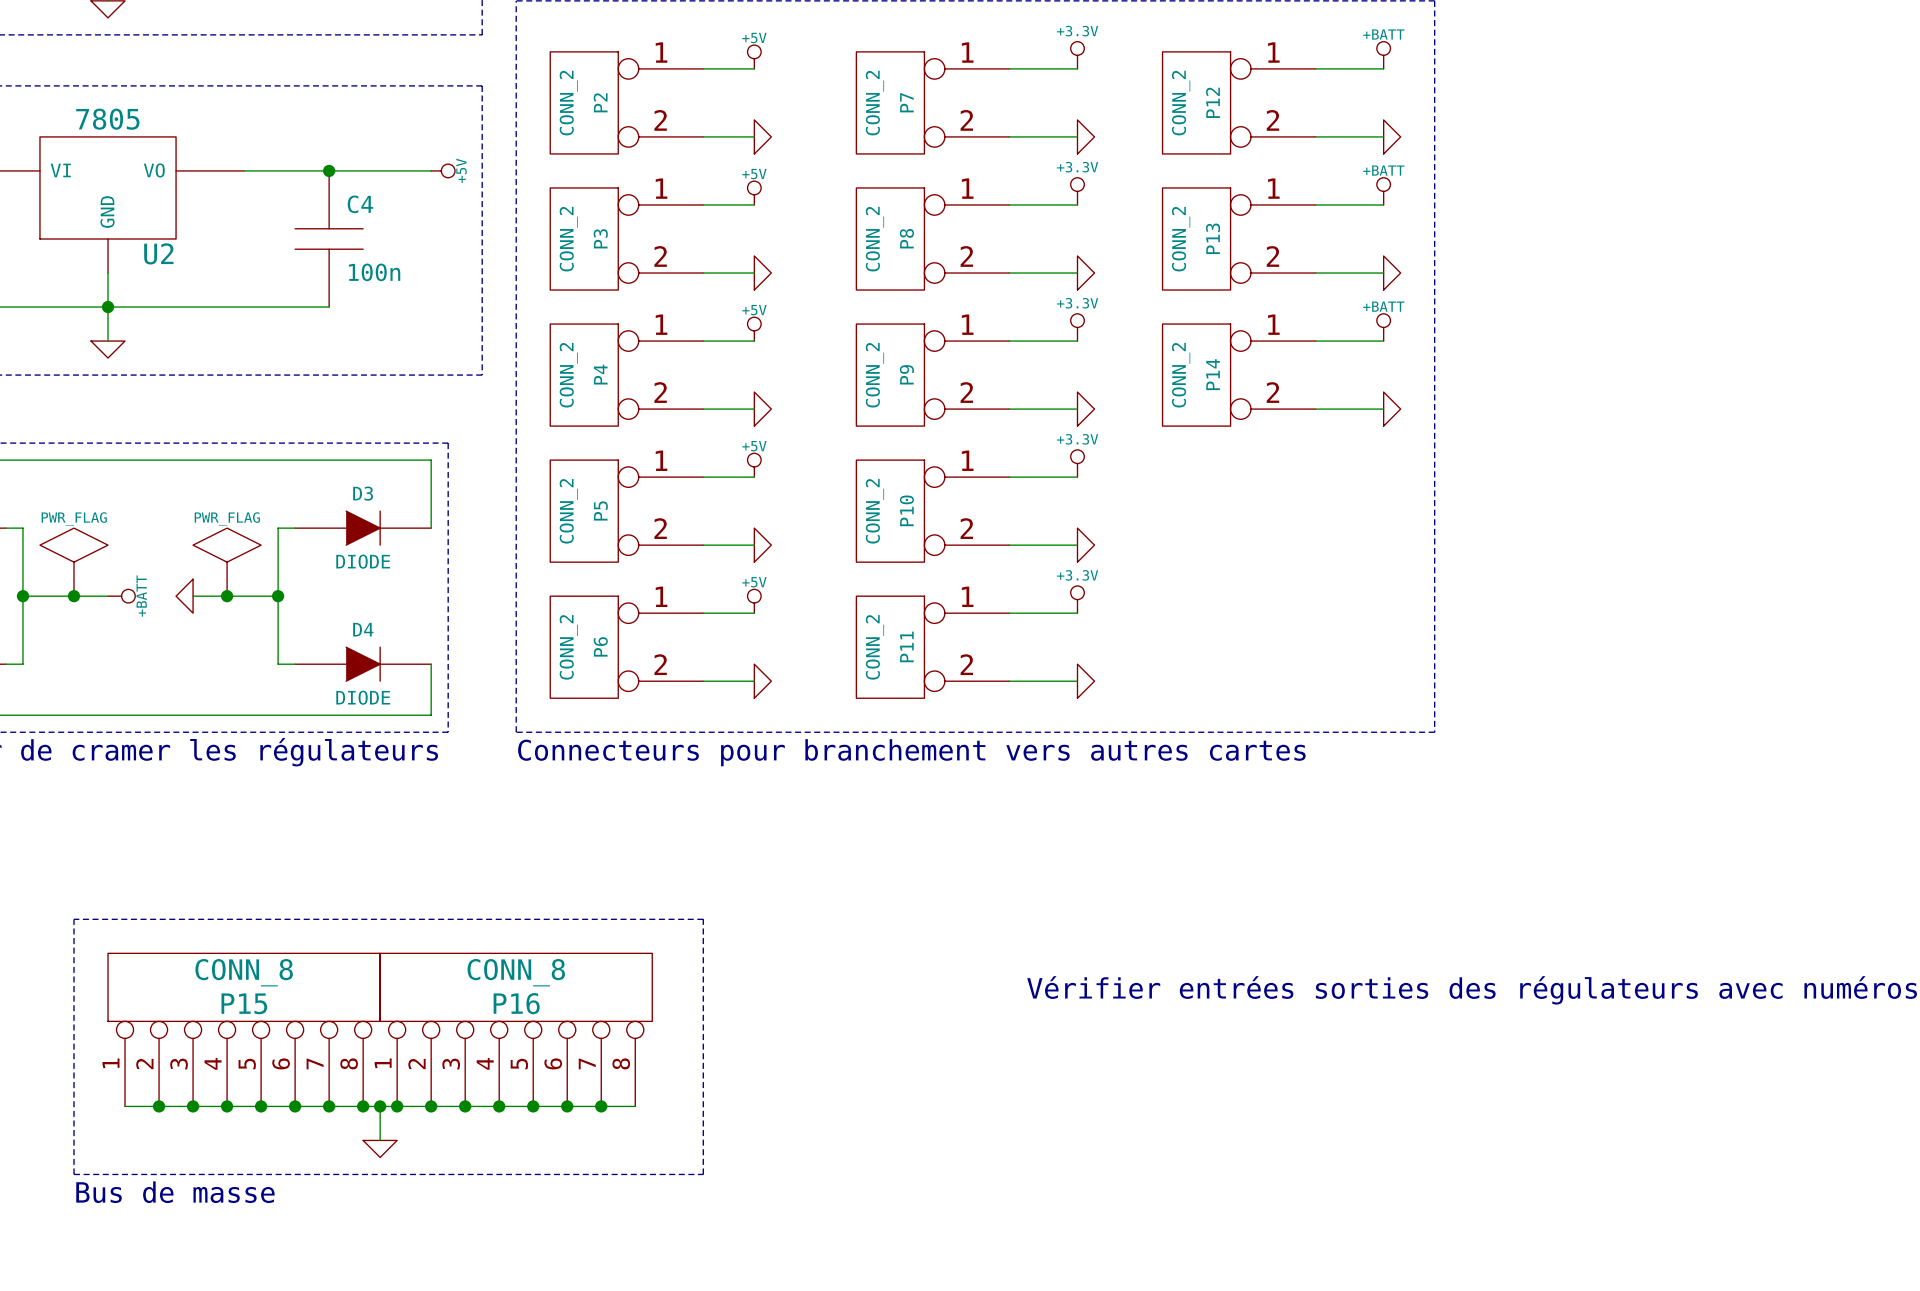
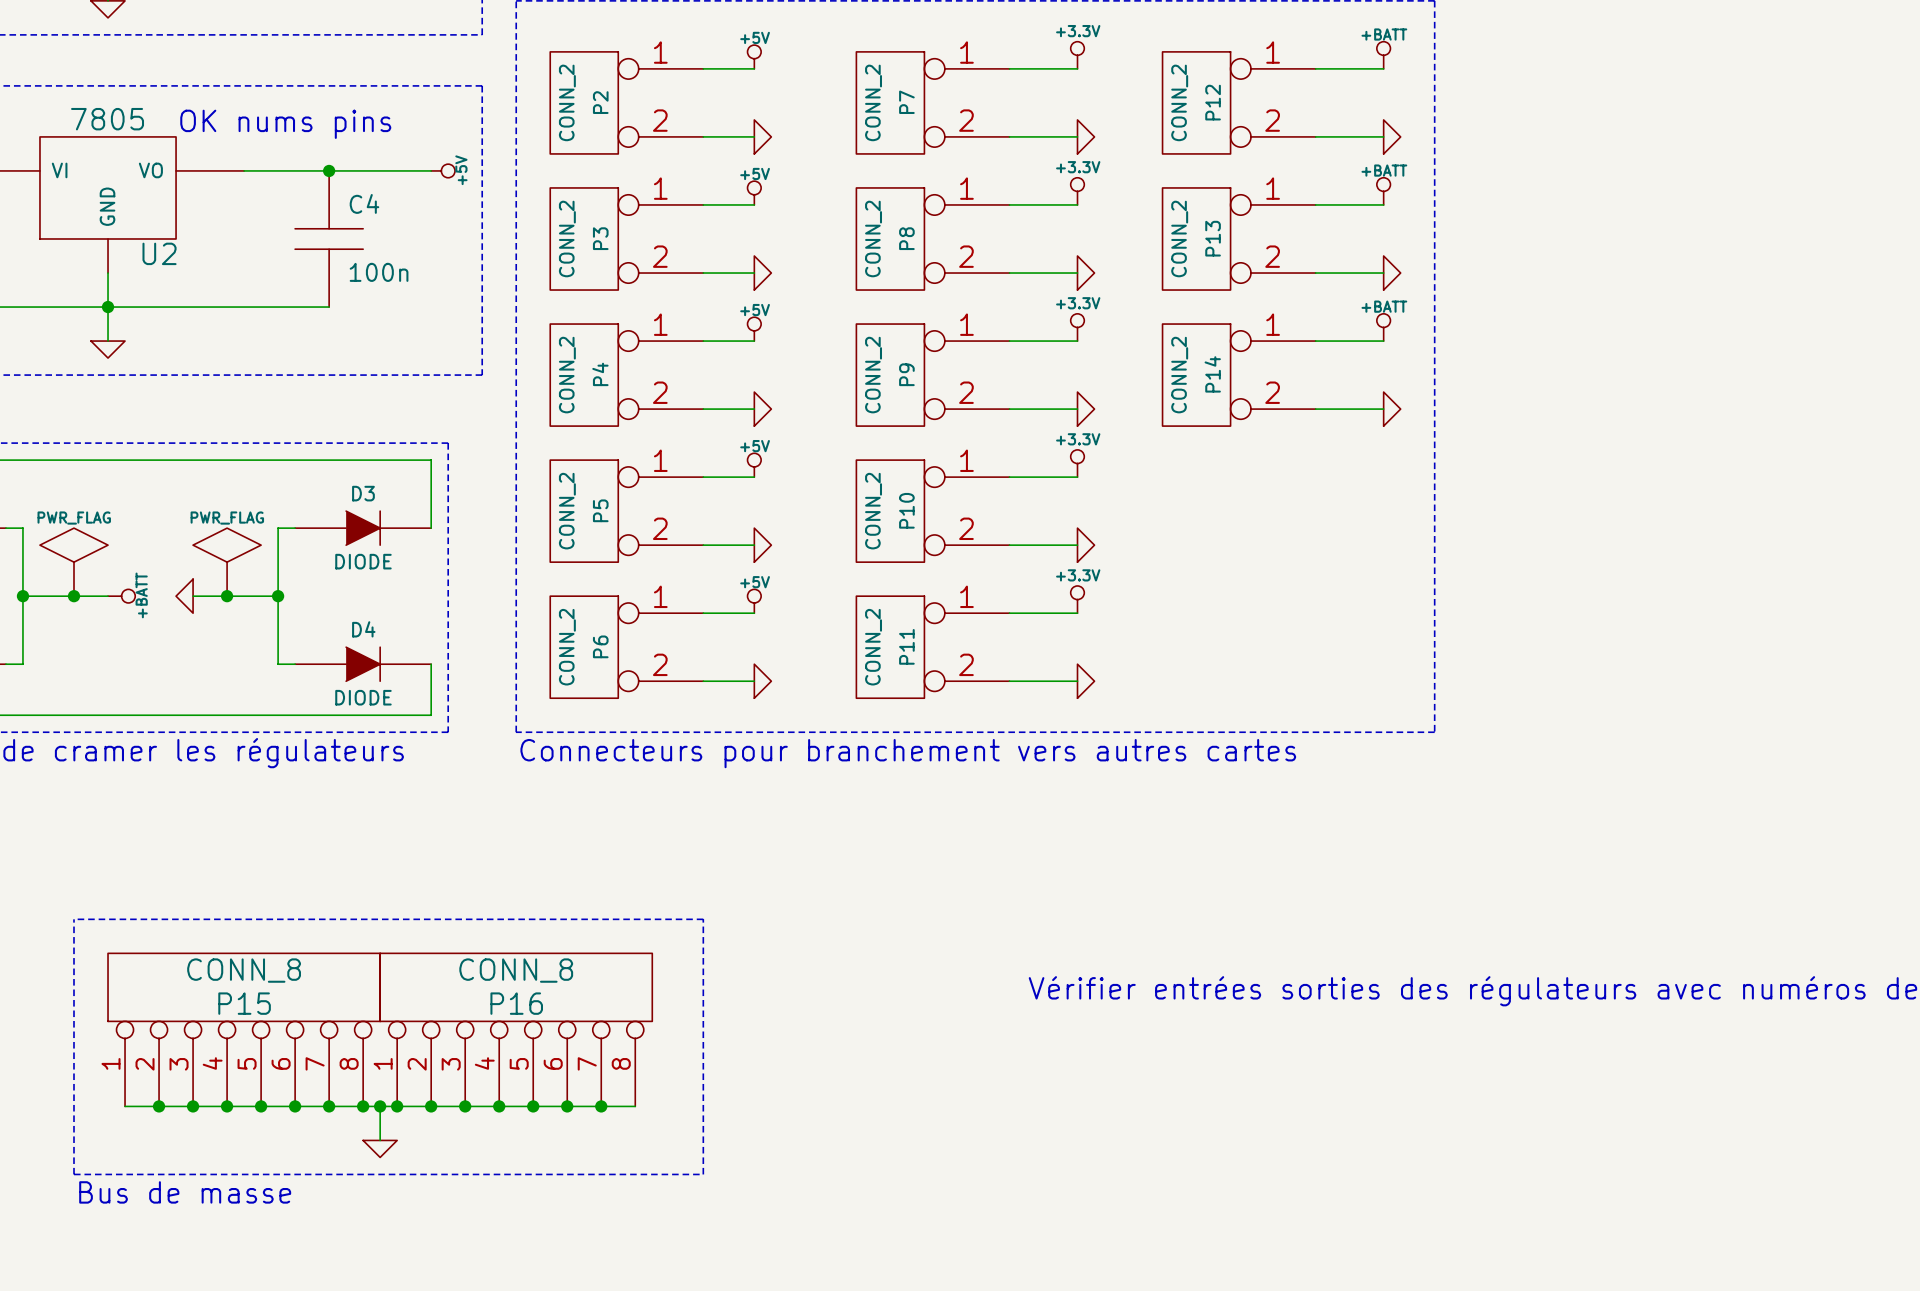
text: none -> OK nums pins (285, 124)

